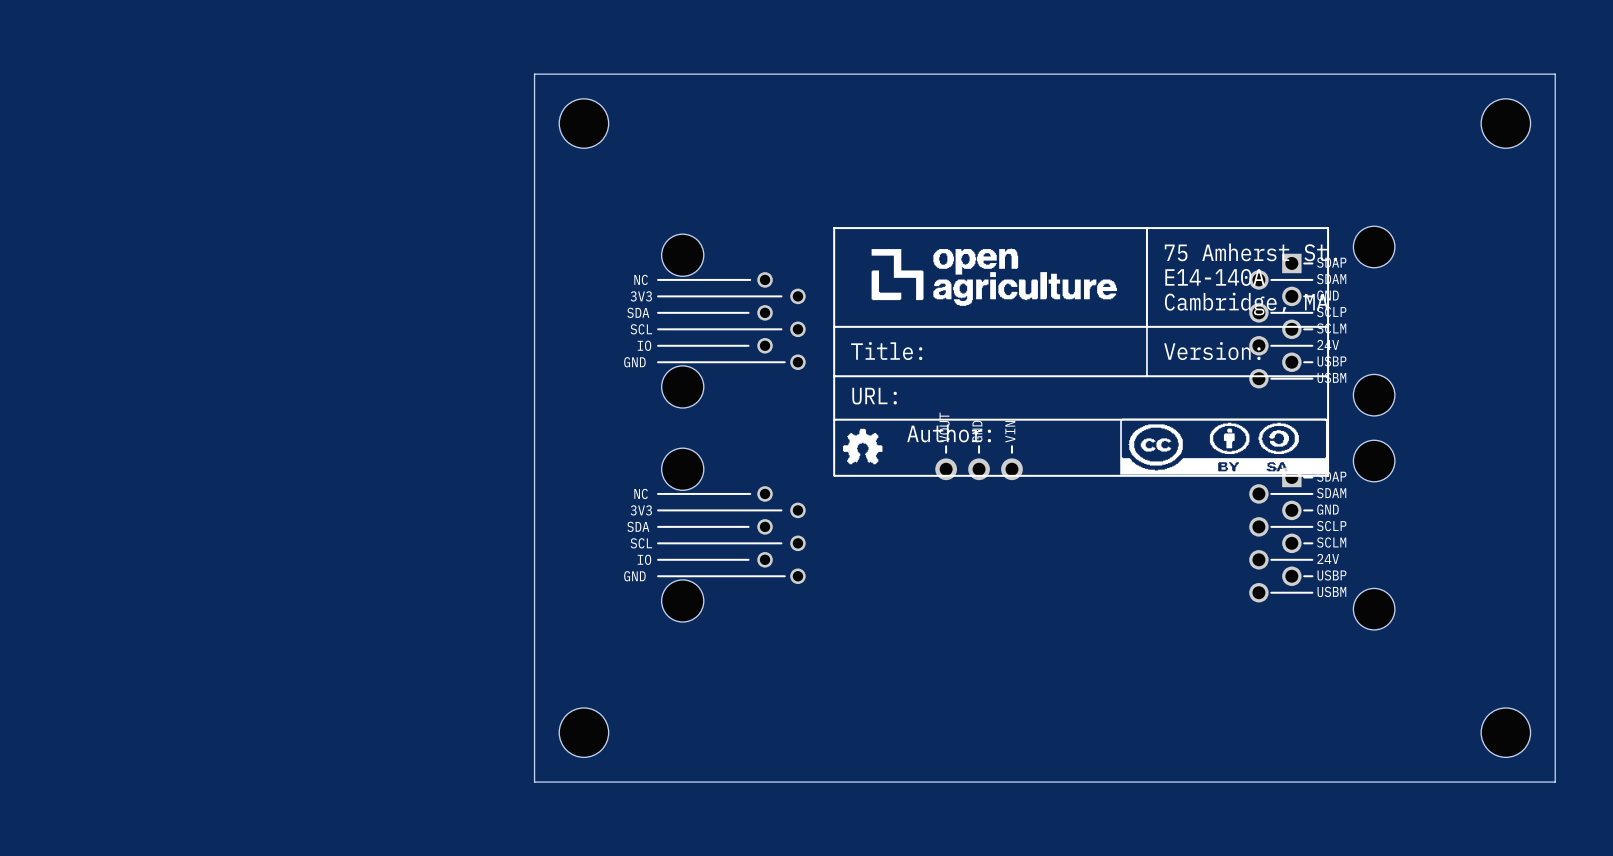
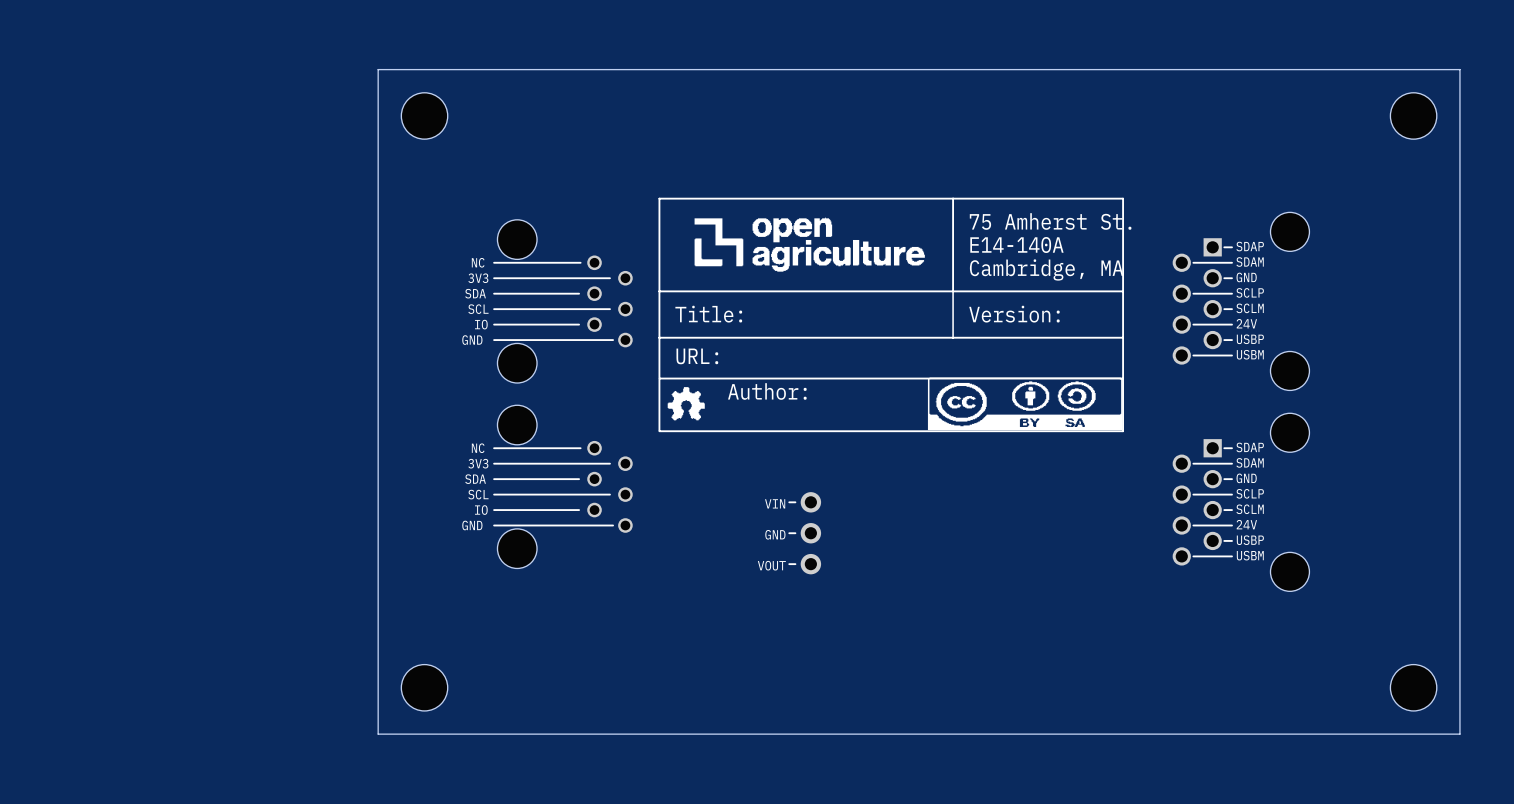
board edge: (534, 74) (534, 782) -> (501, 69) (378, 69) (378, 734) (501, 734)
part position: (583, 123) -> (424, 115)
part: none -> (562, 301)
part: (731, 321) -> none
drawing position: (1081, 351) -> (891, 314)
part: (979, 462) -> none
part: none -> (562, 486)
part: (731, 535) -> none
part: none -> (804, 533)
part position: (583, 732) -> (424, 687)

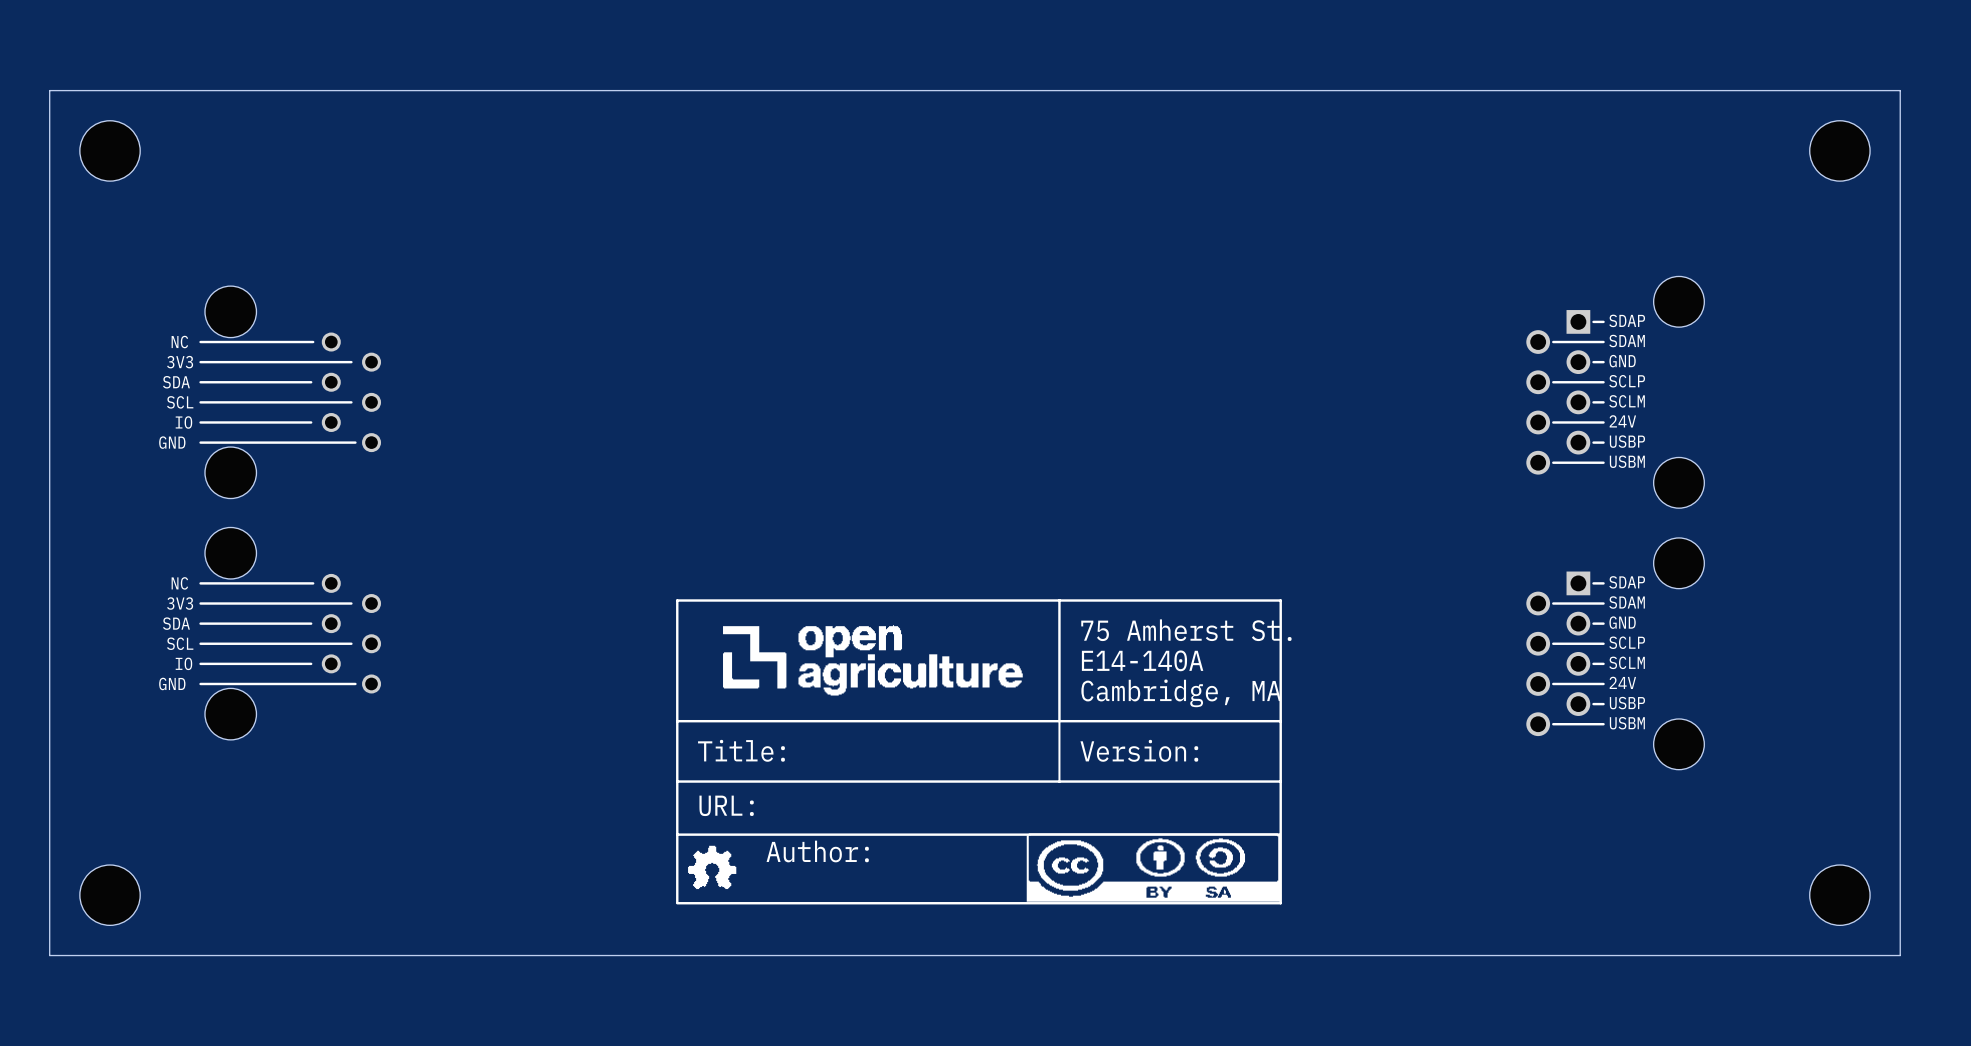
board edge: (378, 69) (378, 734) -> (492, 90) (49, 90) (49, 955) (492, 955)
part: none -> (110, 150)
part: (424, 115) -> none
part: none -> (290, 392)
part: (562, 301) -> none
drawing position: (891, 314) -> (978, 751)
part: none -> (290, 633)
part: (562, 486) -> none
part: (804, 533) -> none
part: none -> (110, 895)
part: (424, 687) -> none

